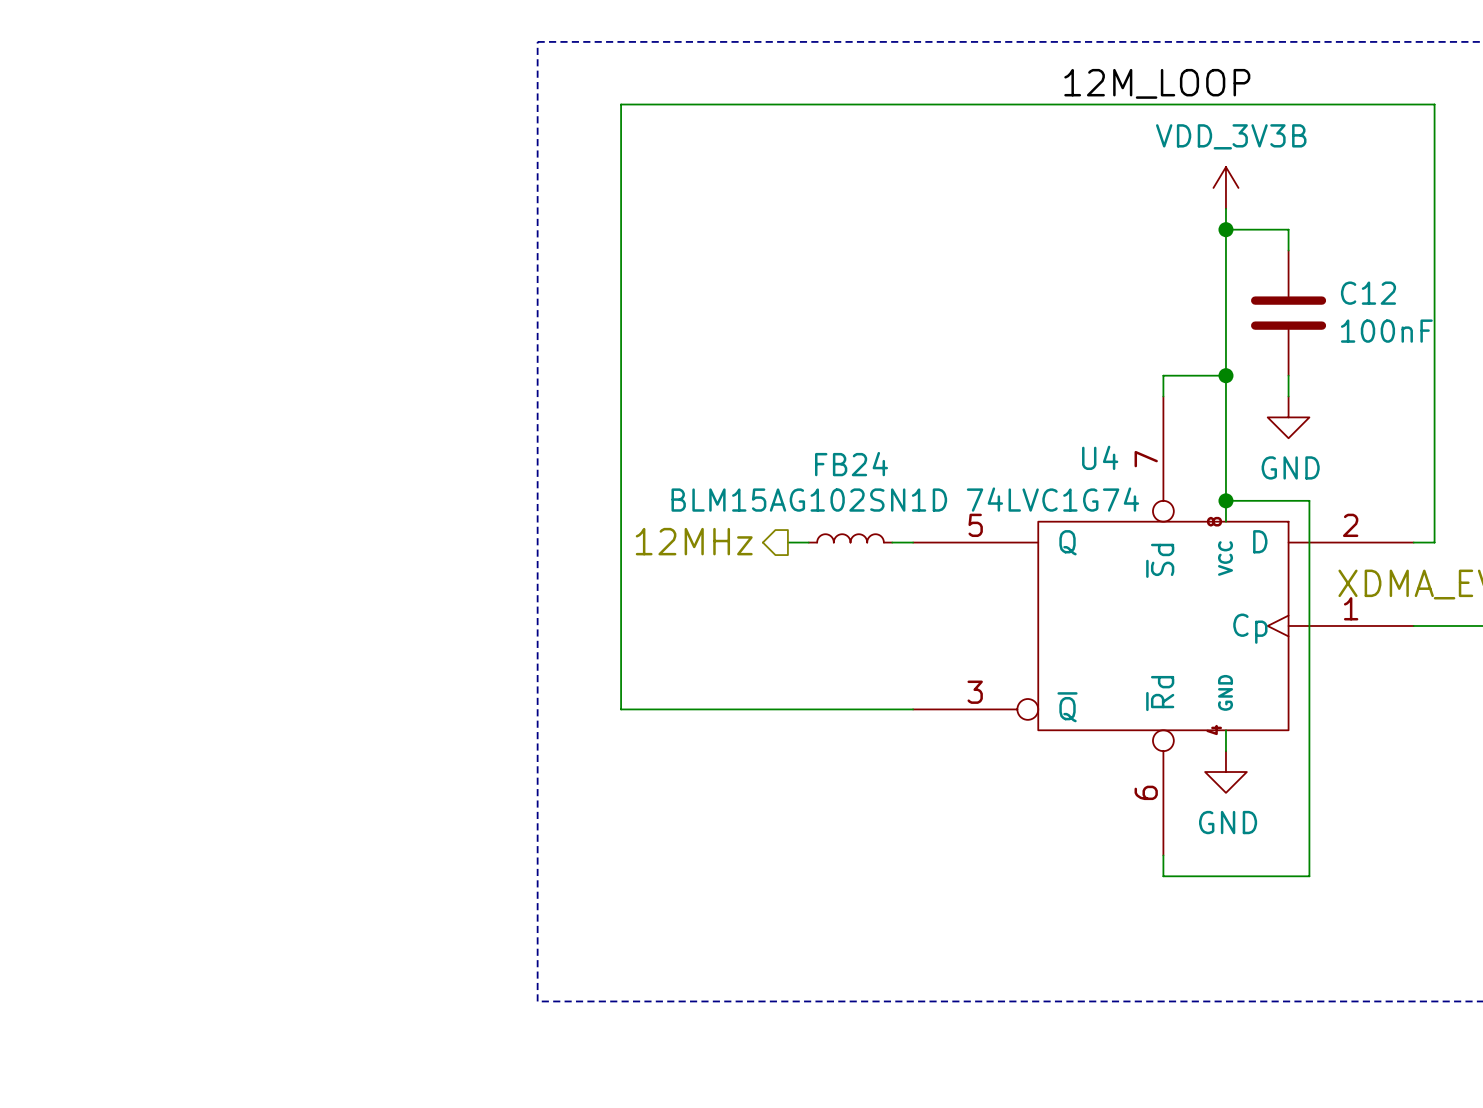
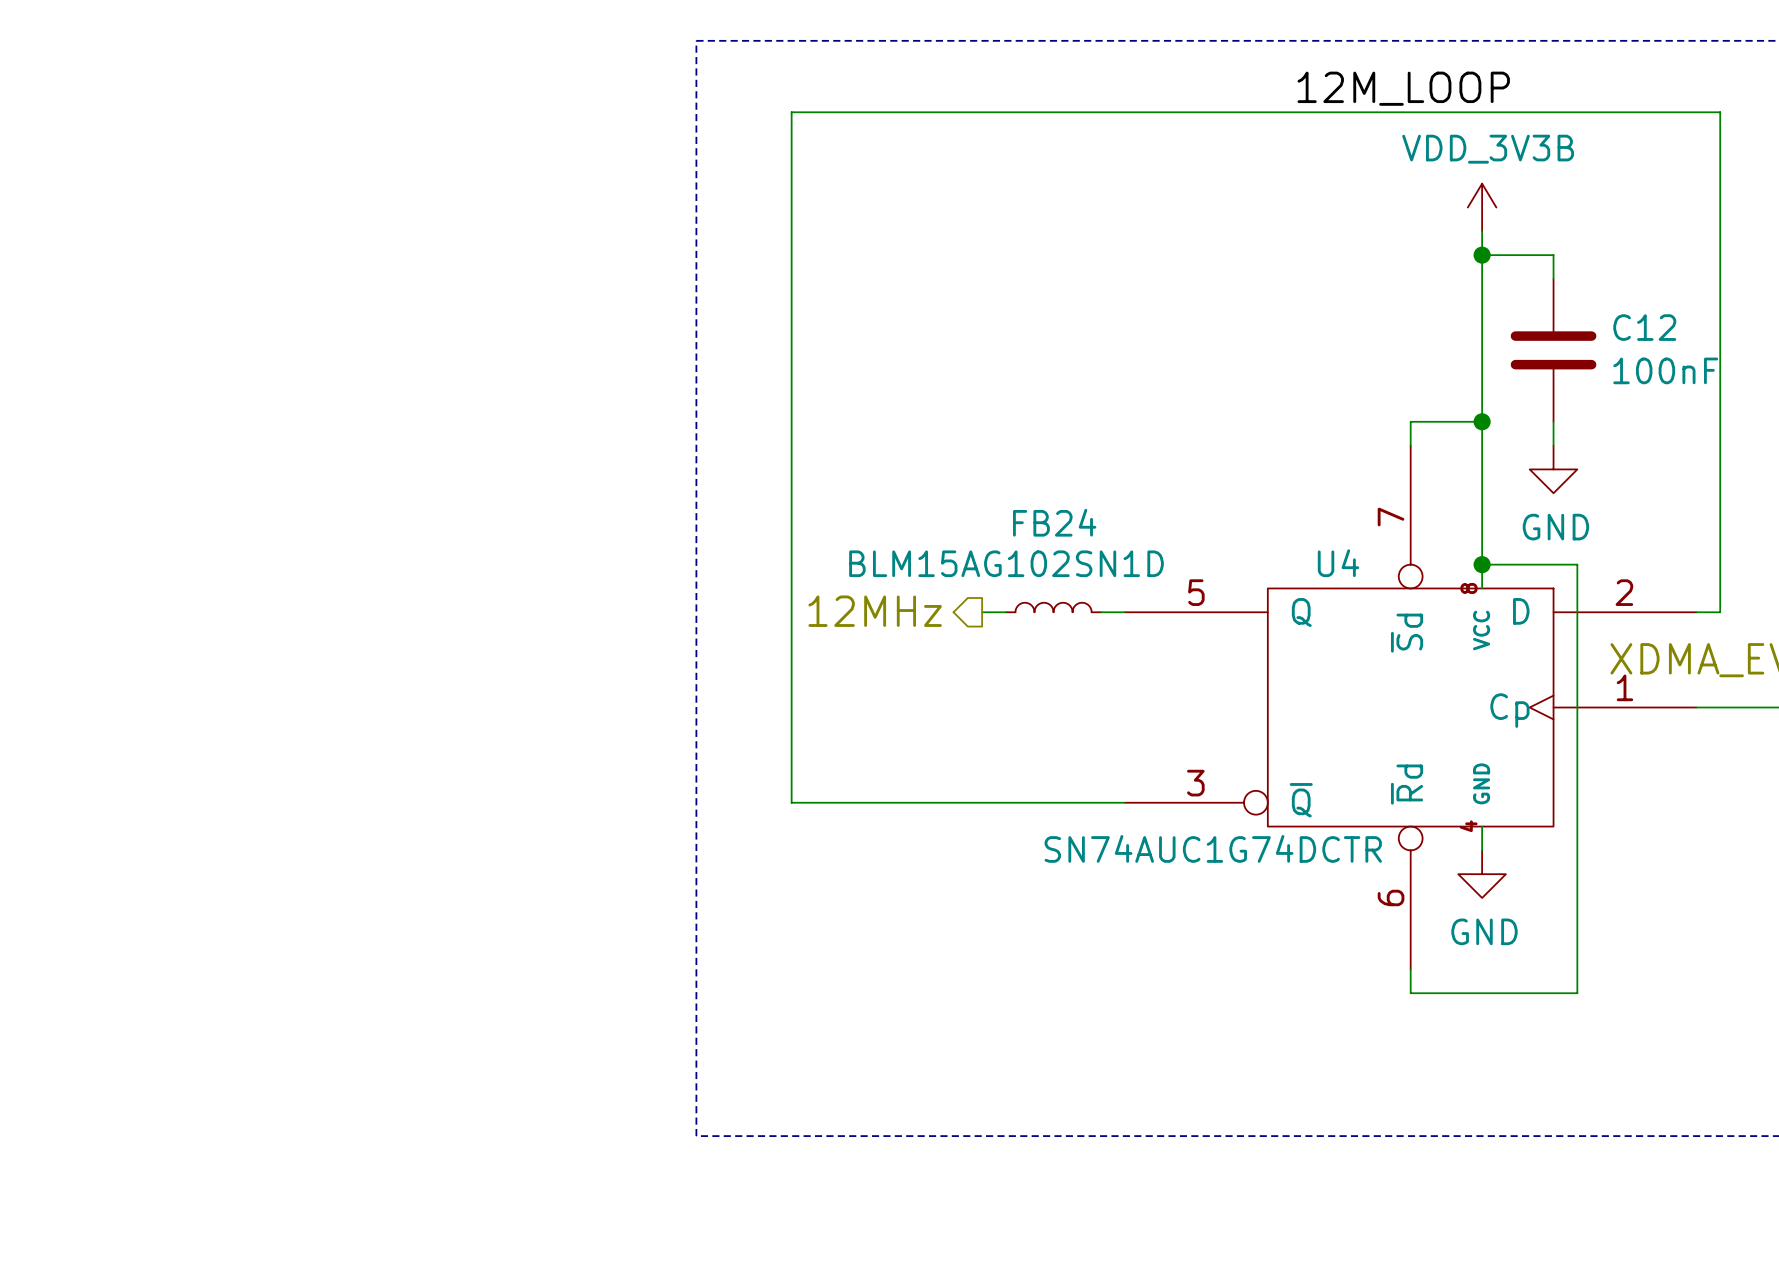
U4 name position: U4 (1100, 457) -> U4 (1338, 563)
U4 value: 74LVC1G74 (1052, 499) -> SN74AUC1G74DCTR (1213, 848)

